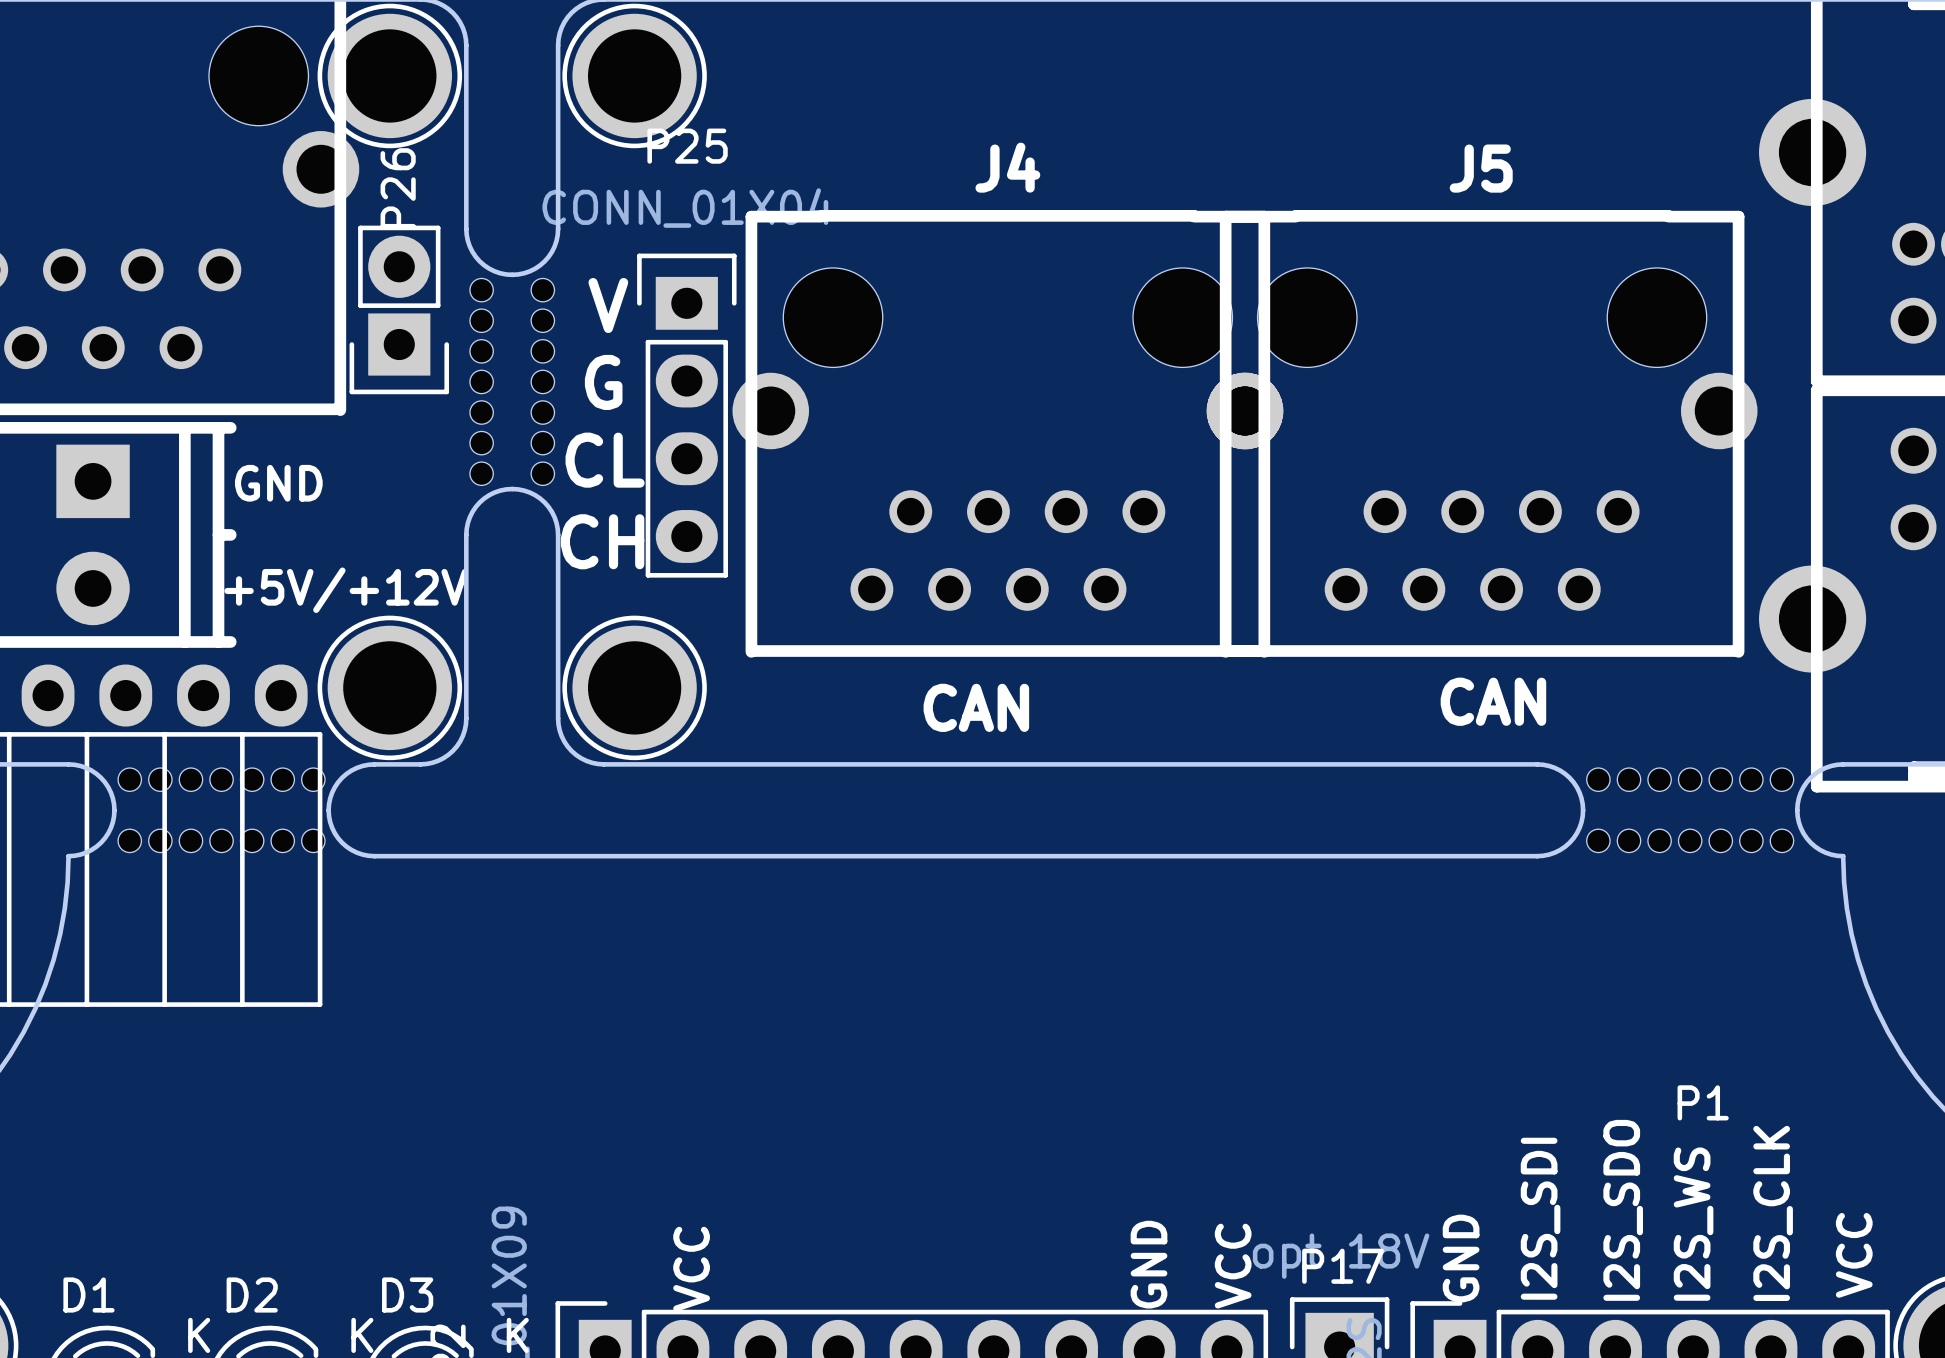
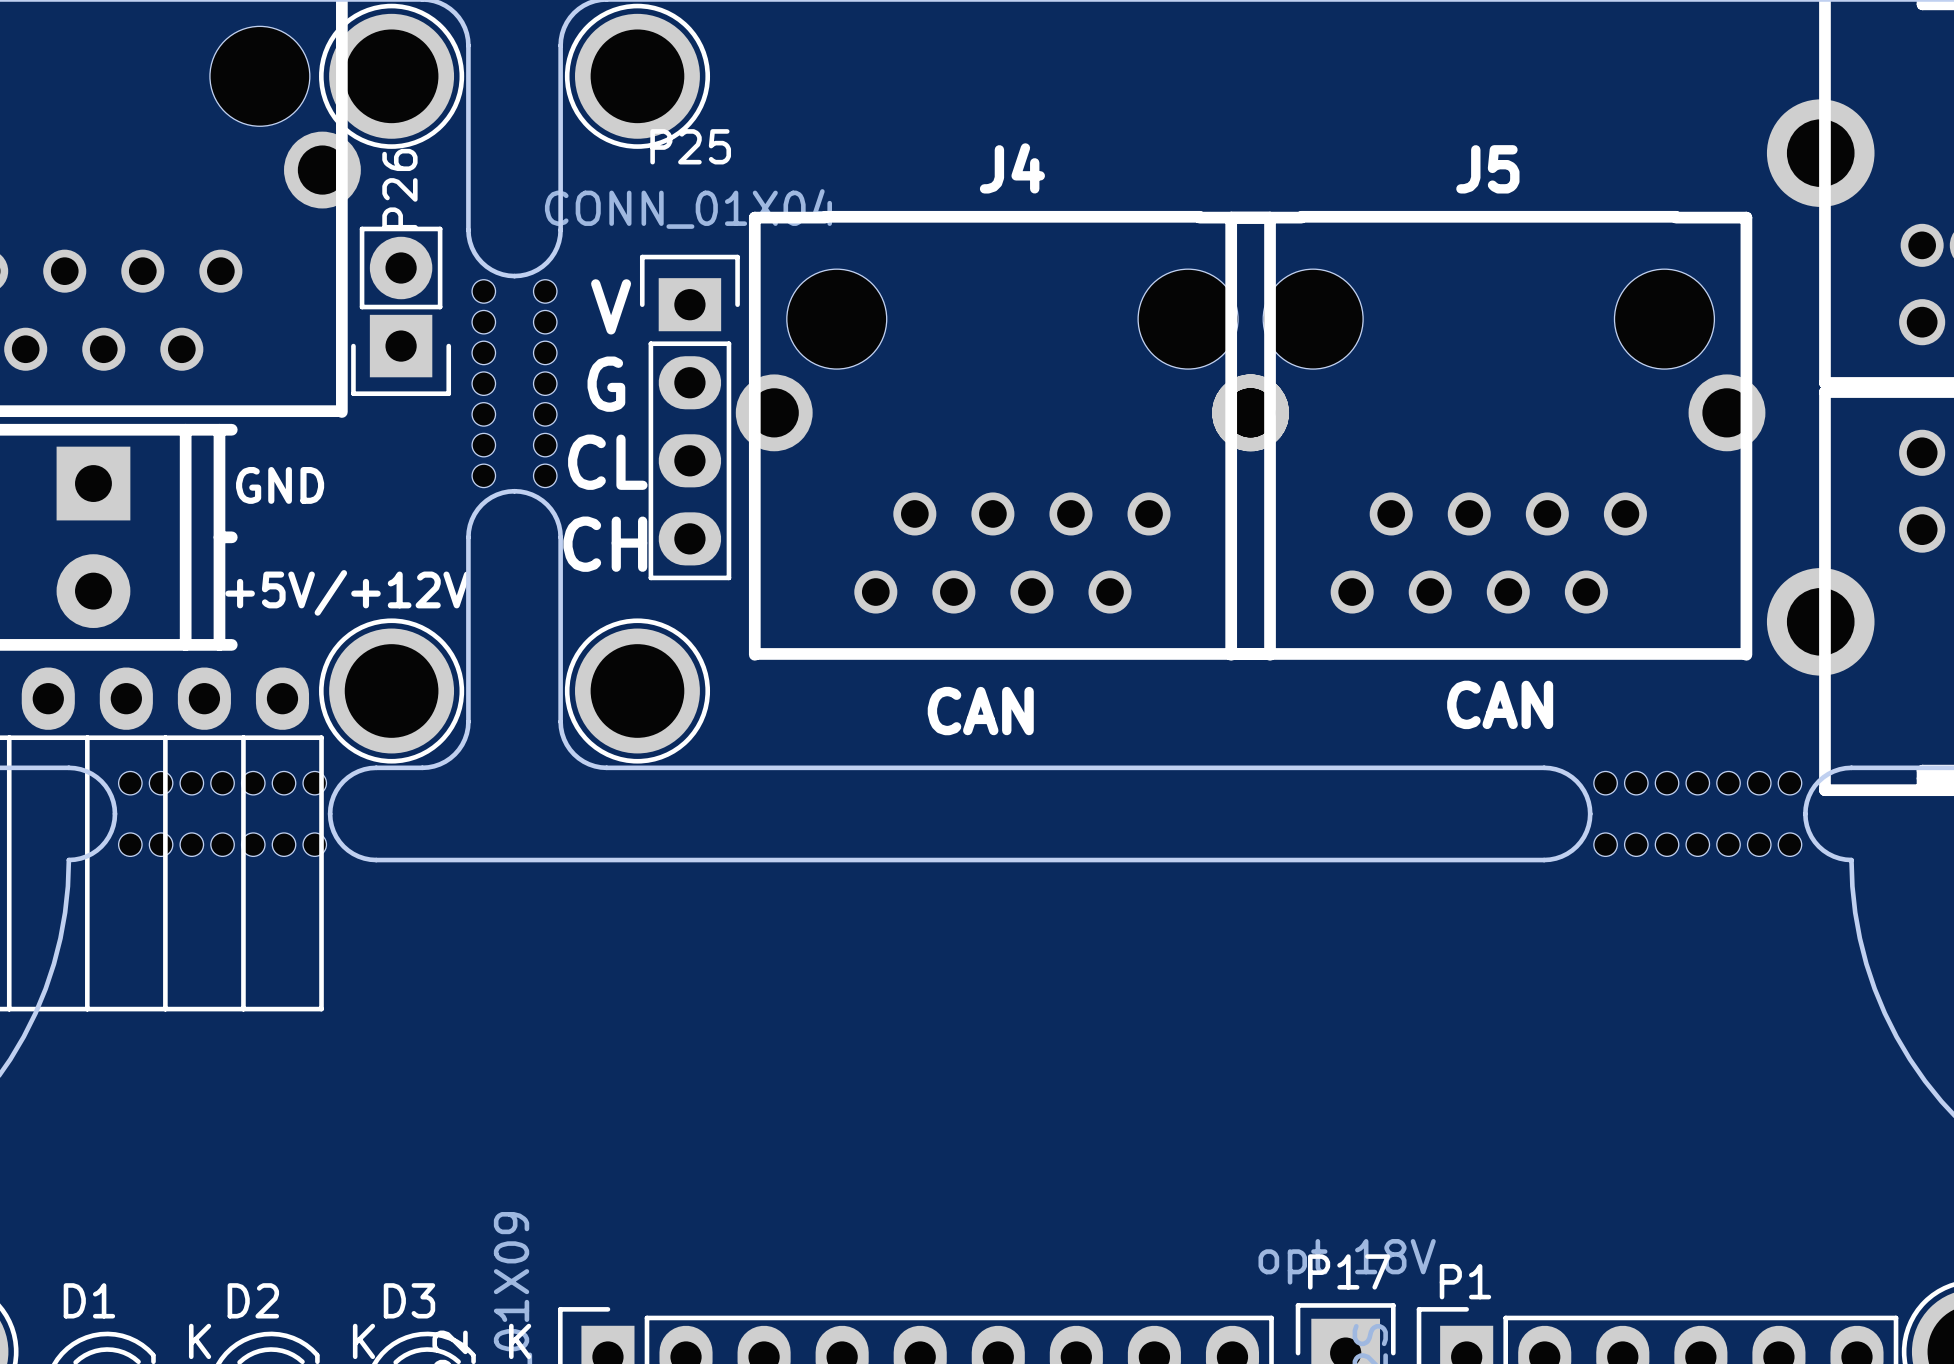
P1 name position: P1 (1703, 1102) -> P1 (1465, 1281)
text: I2S_SDO (1623, 1210) -> none
text: I2S_CLK (1773, 1213) -> none
text: I2S_SDI (1540, 1218) -> none
text: I2S_WS (1693, 1224) -> none
text: VCC (1854, 1255) -> none
text: GND (1461, 1258) -> none
text: GND (1149, 1264) -> none
text: VCC (1233, 1266) -> none
text: VCC (691, 1269) -> none

